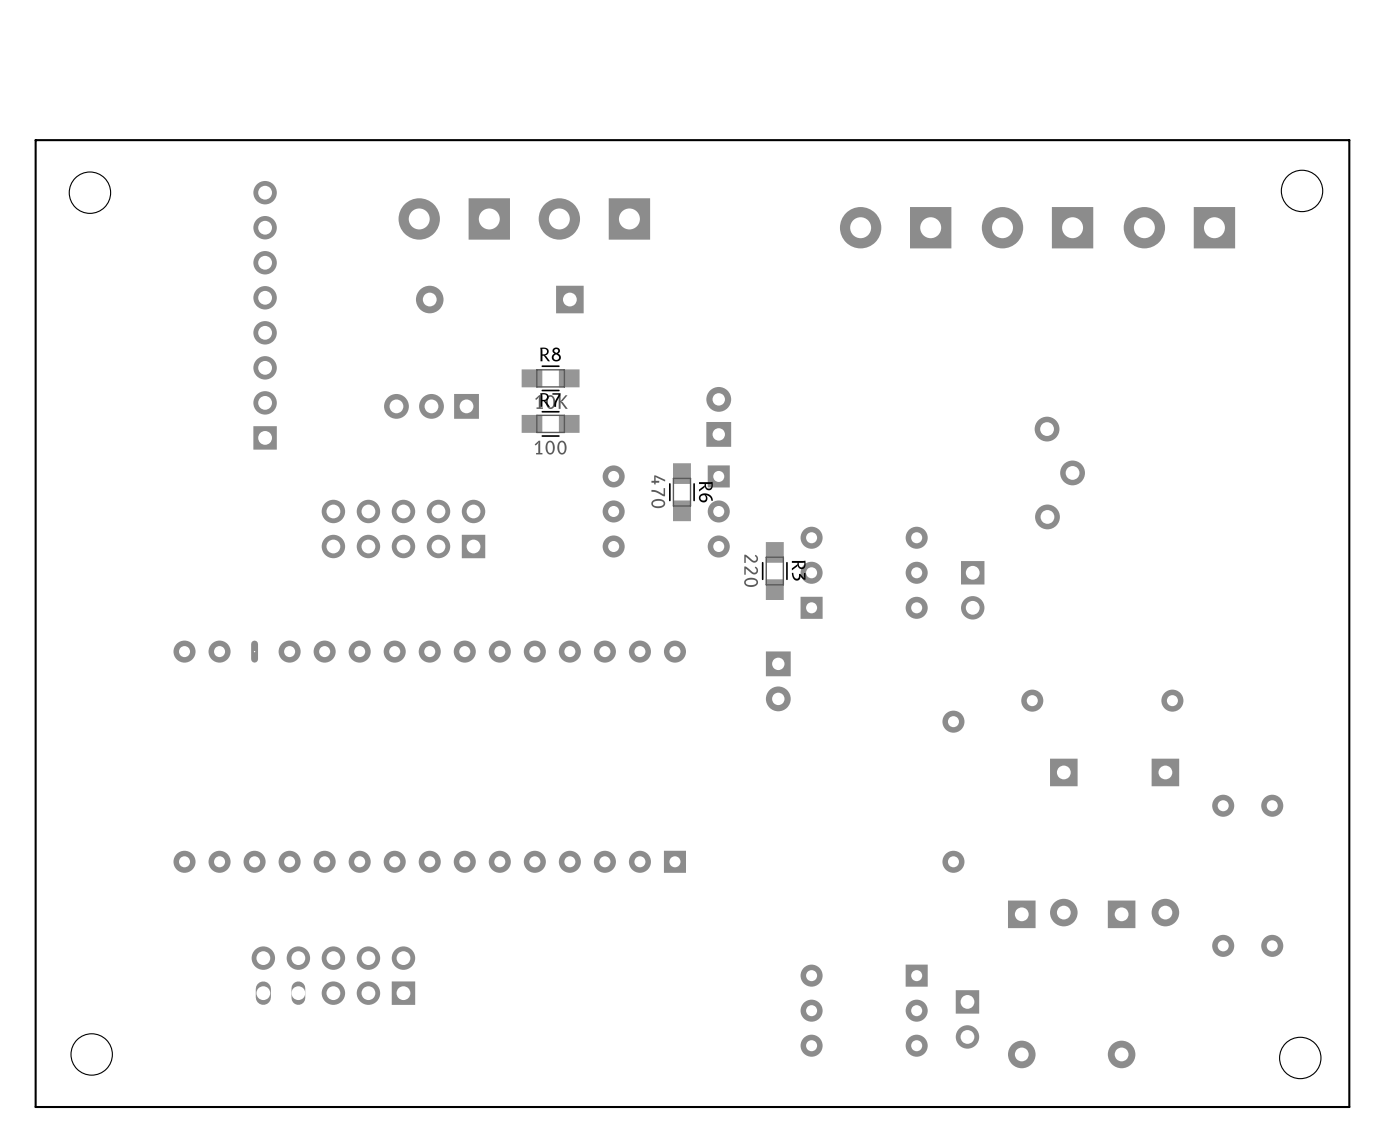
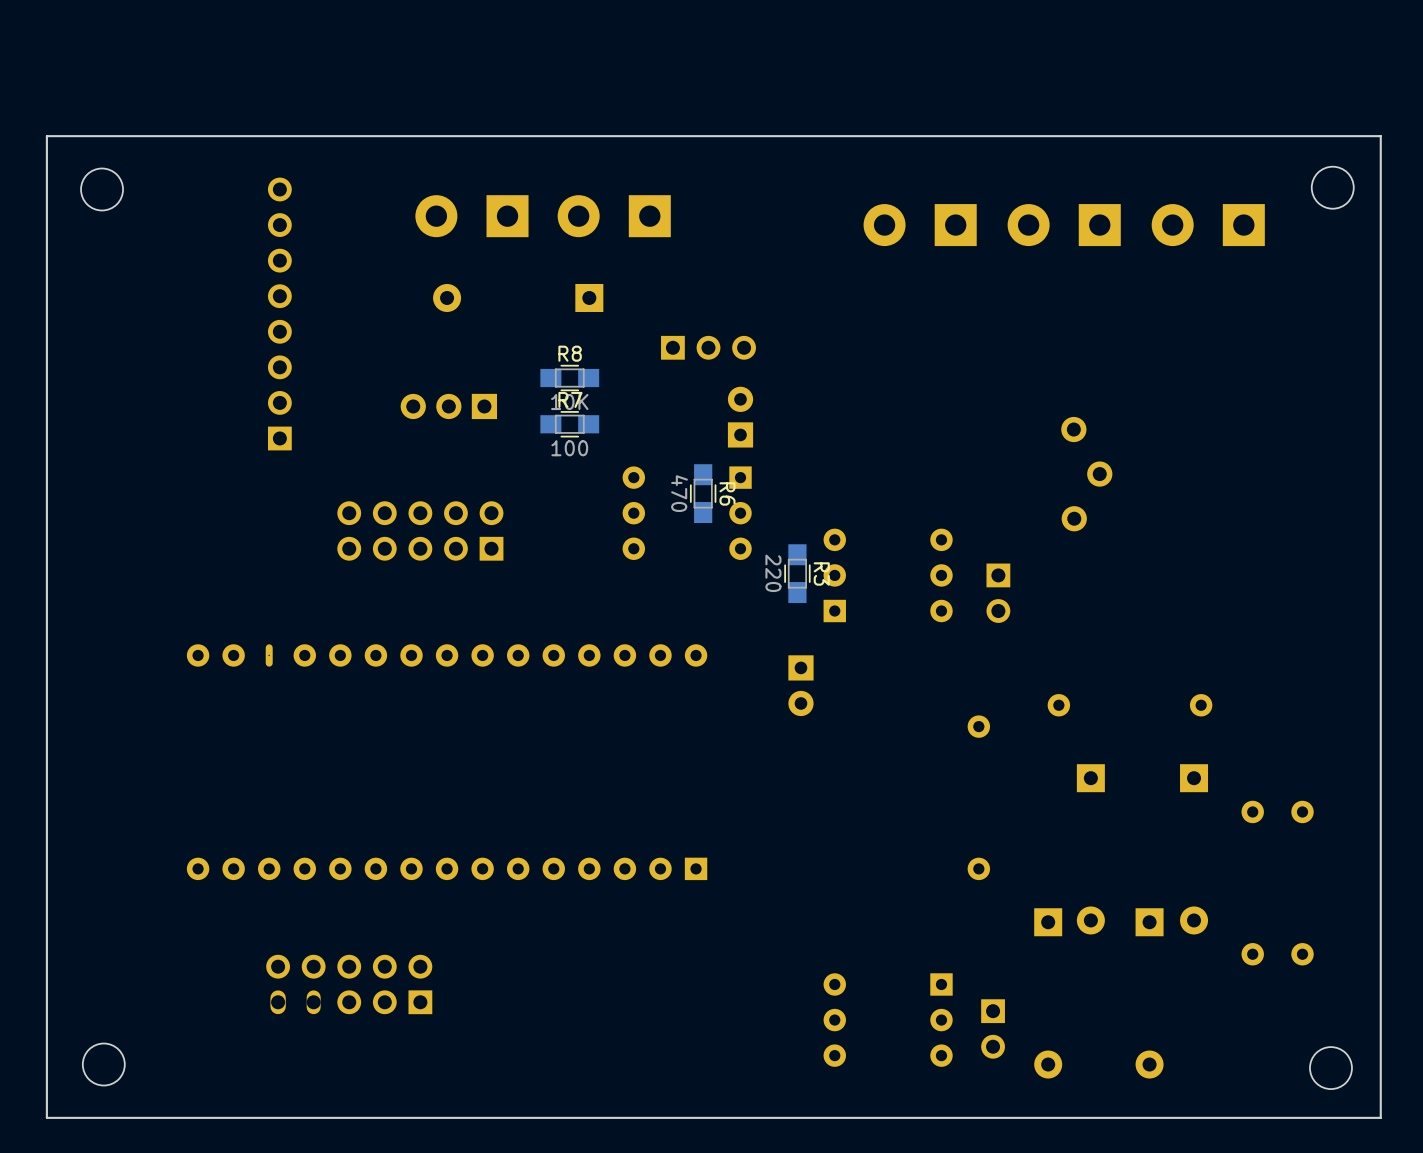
part: none -> (708, 347)

